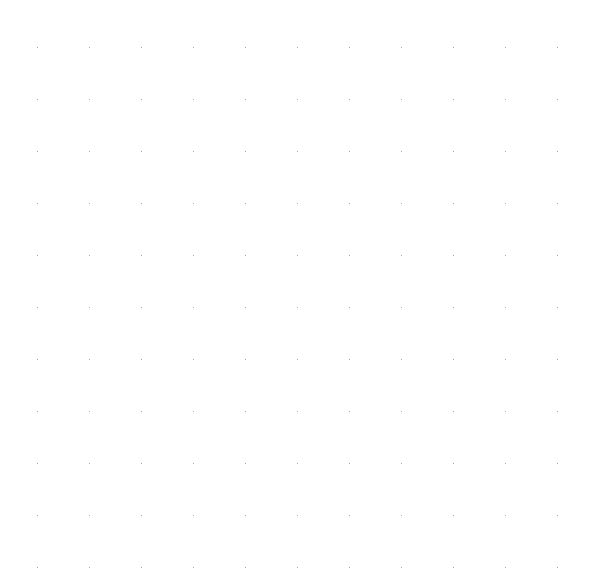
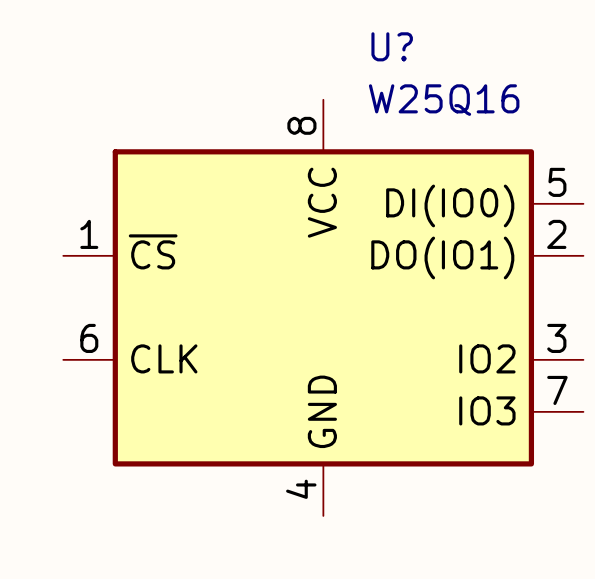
U?: none -> W25Q16 (323, 307)

